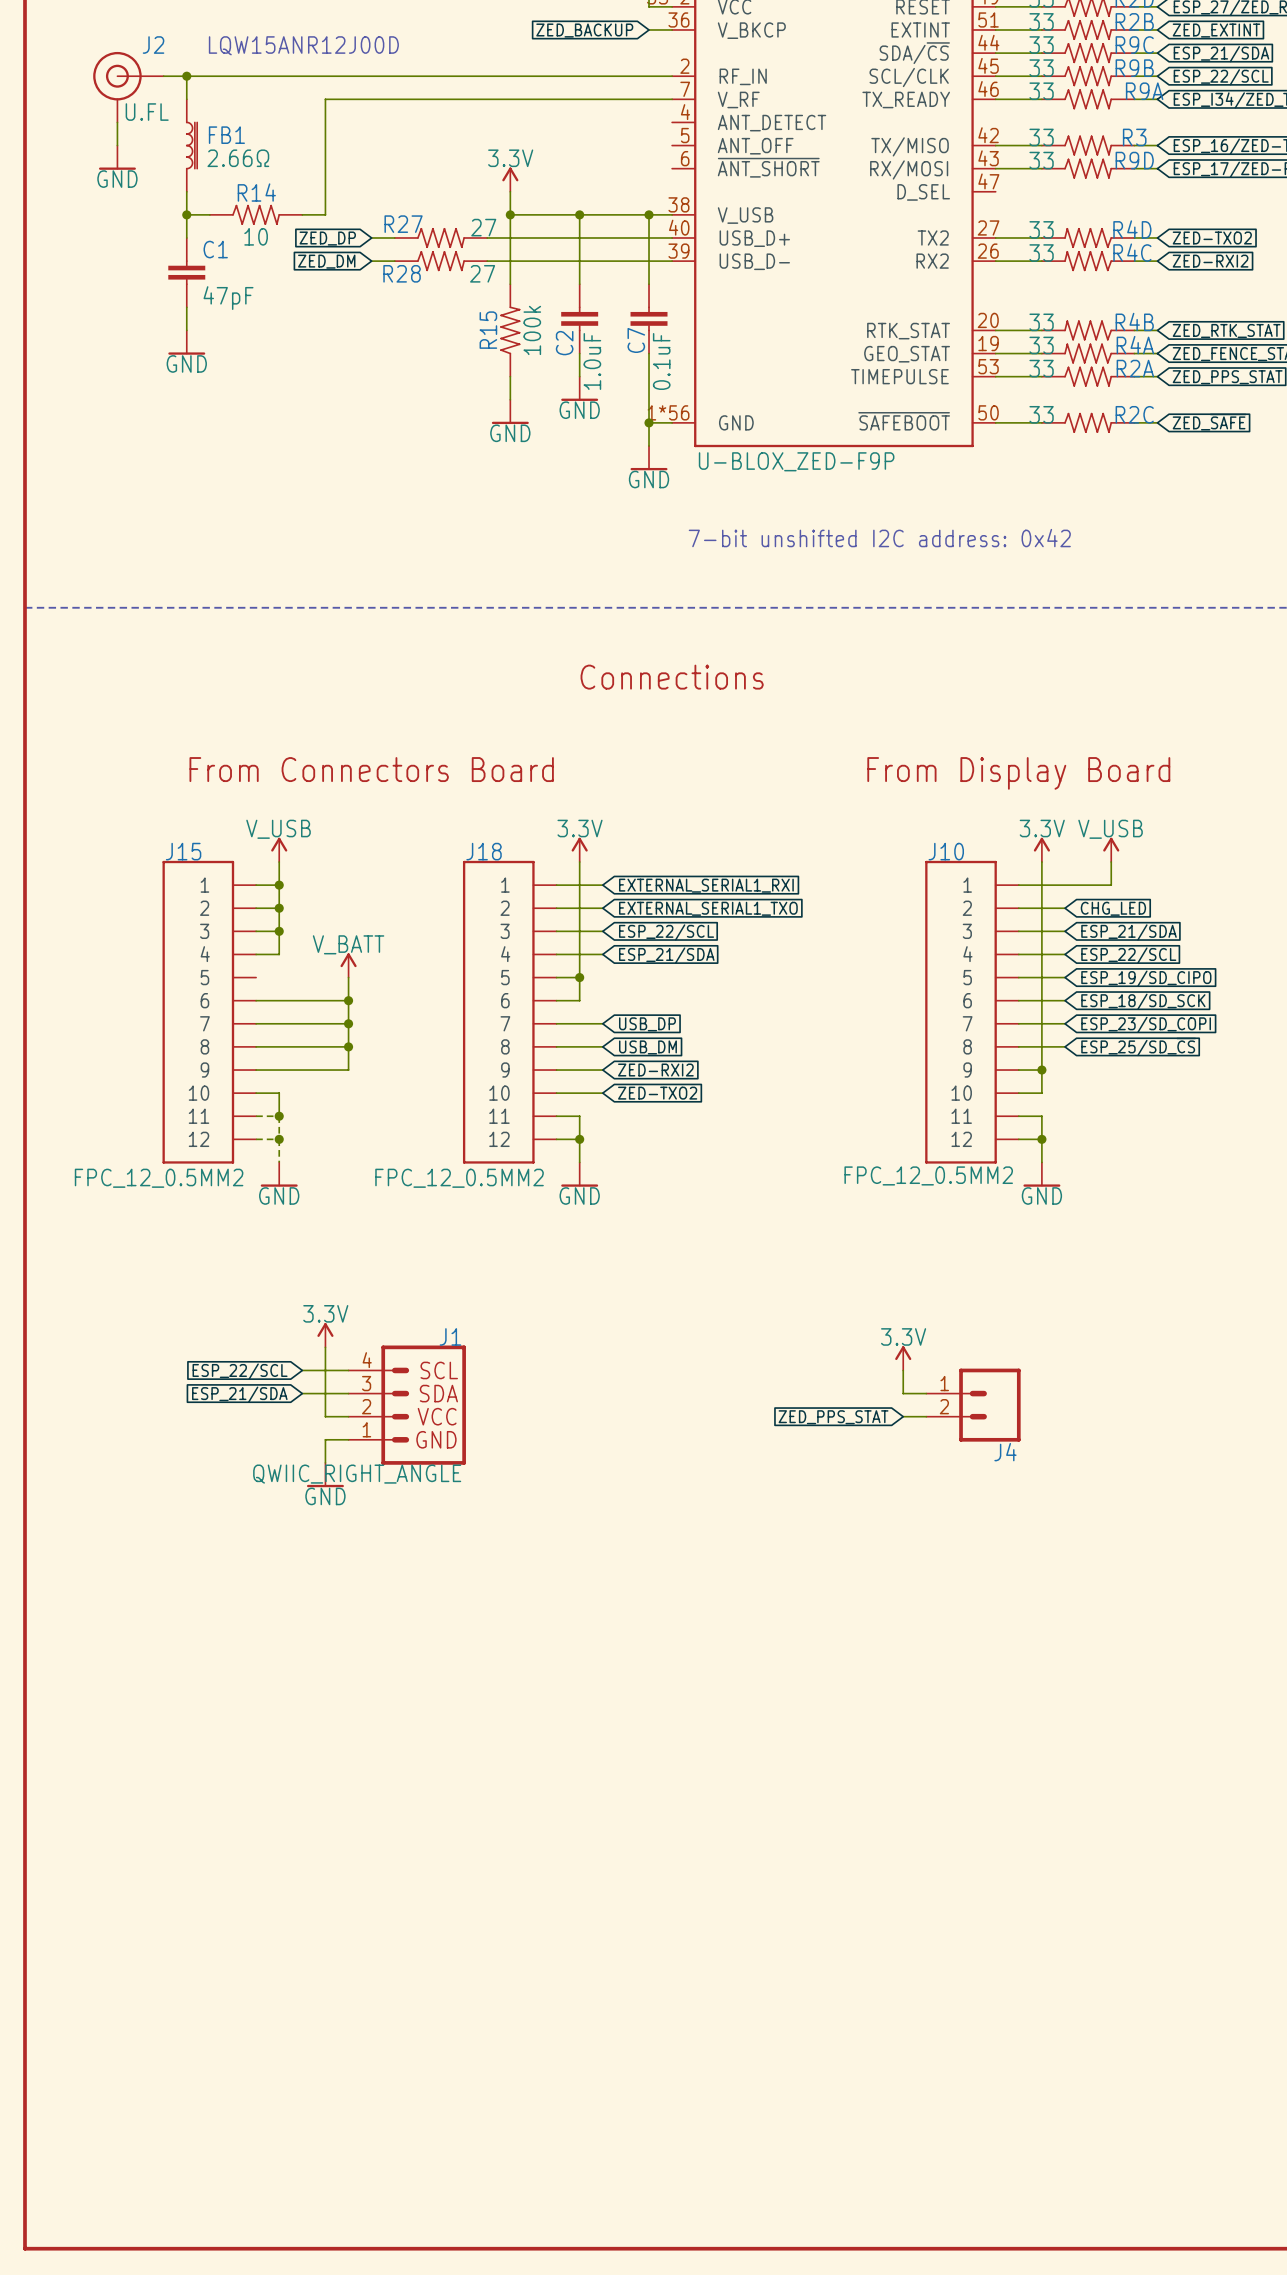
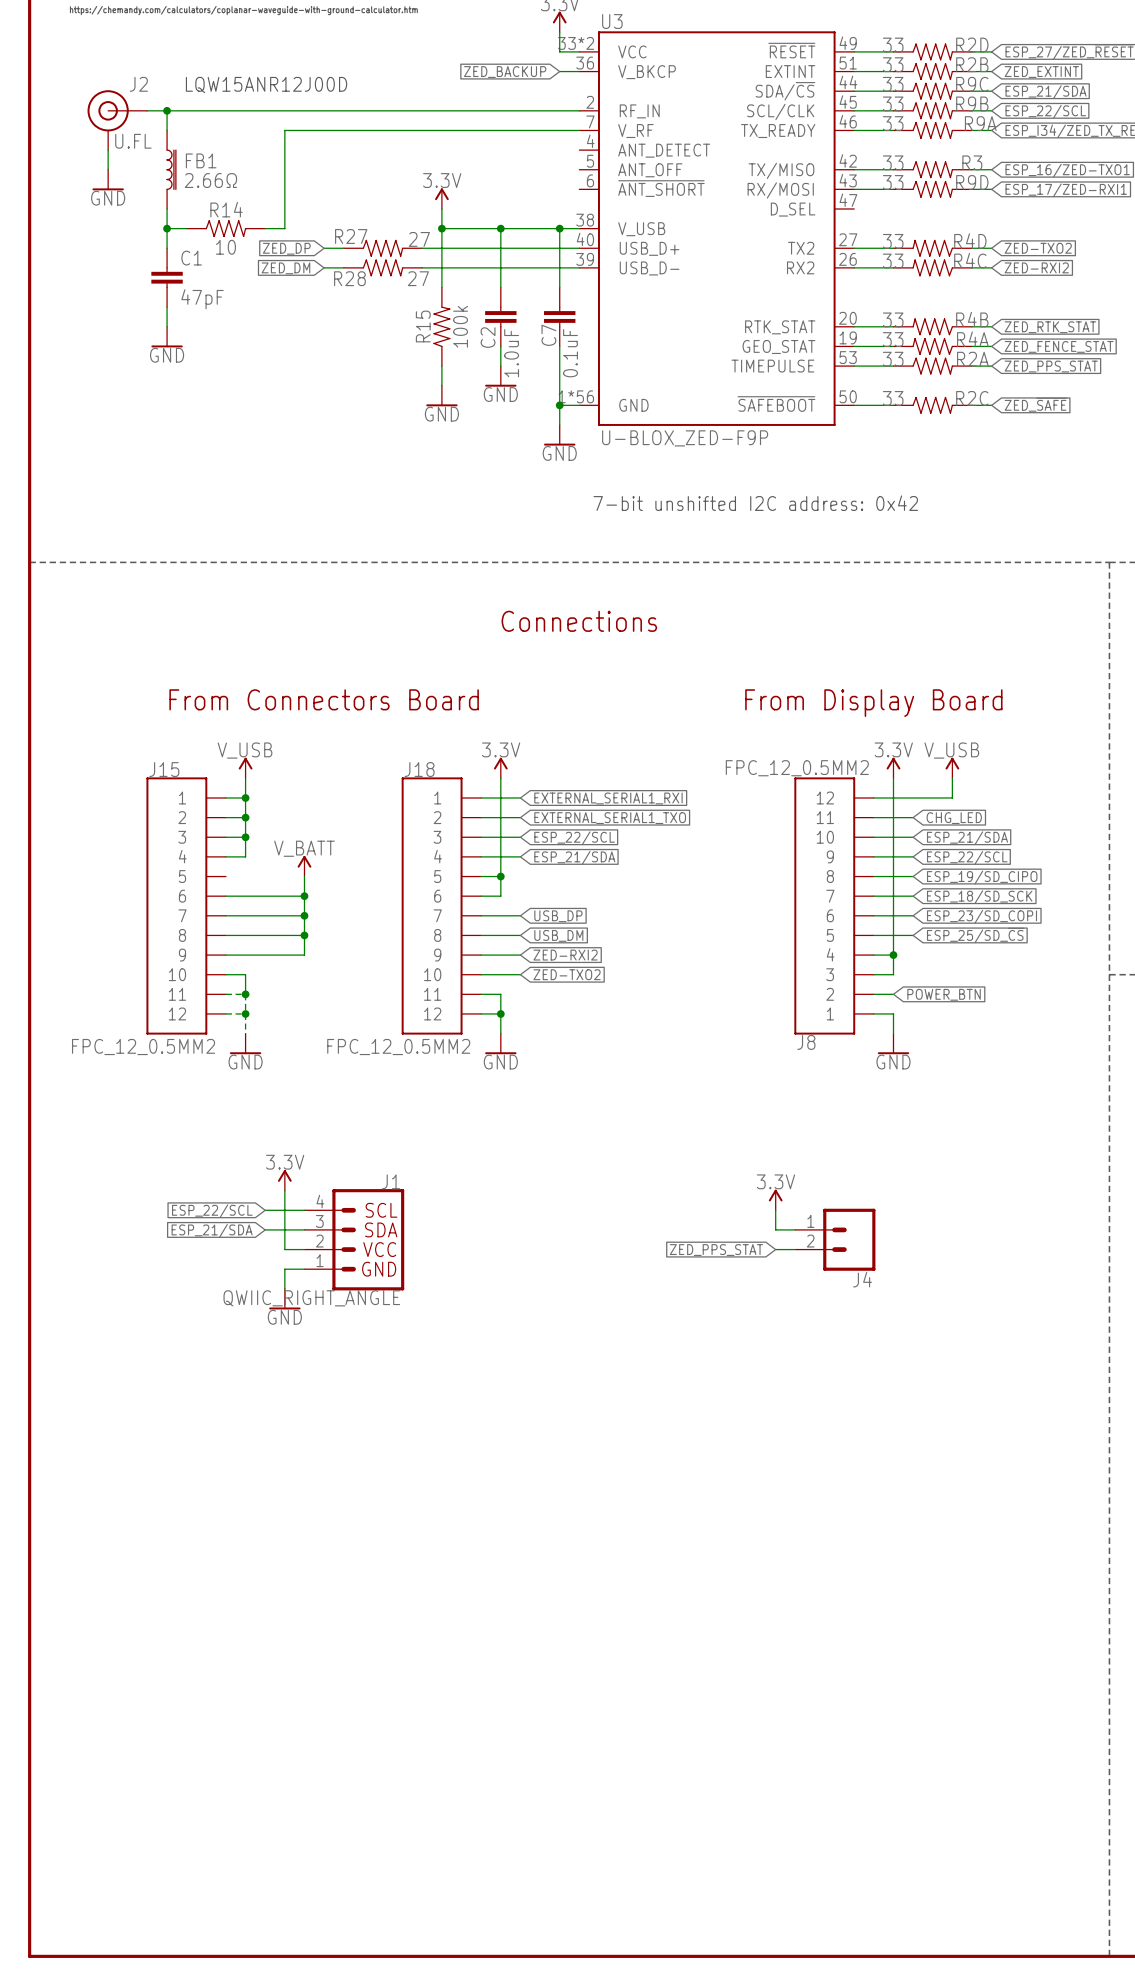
J10 name: J10 (946, 851) -> J8 (806, 1042)
J10 flip: as is (961, 1012) -> up-down (824, 905)
wire: (1041, 1116) (1041, 1139) -> none
global label: none -> POWER_BTN (944, 994)
junction: (1041, 1139) -> none

